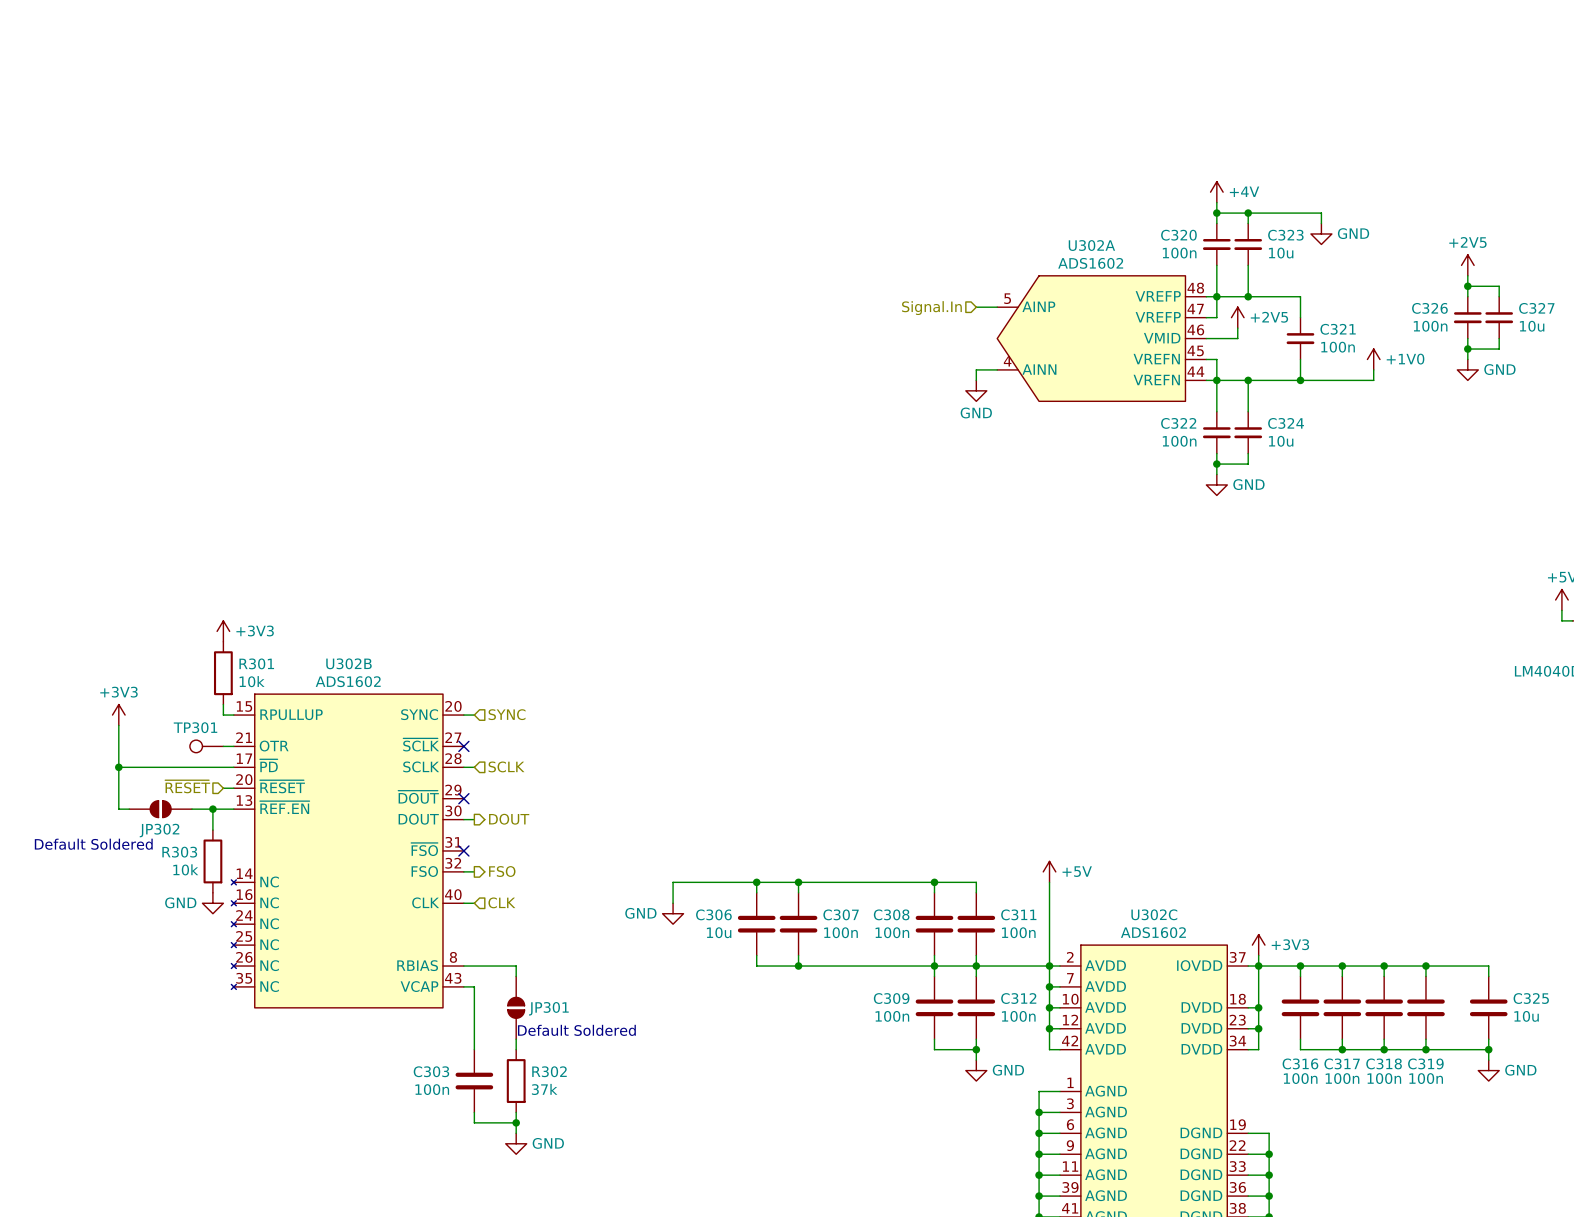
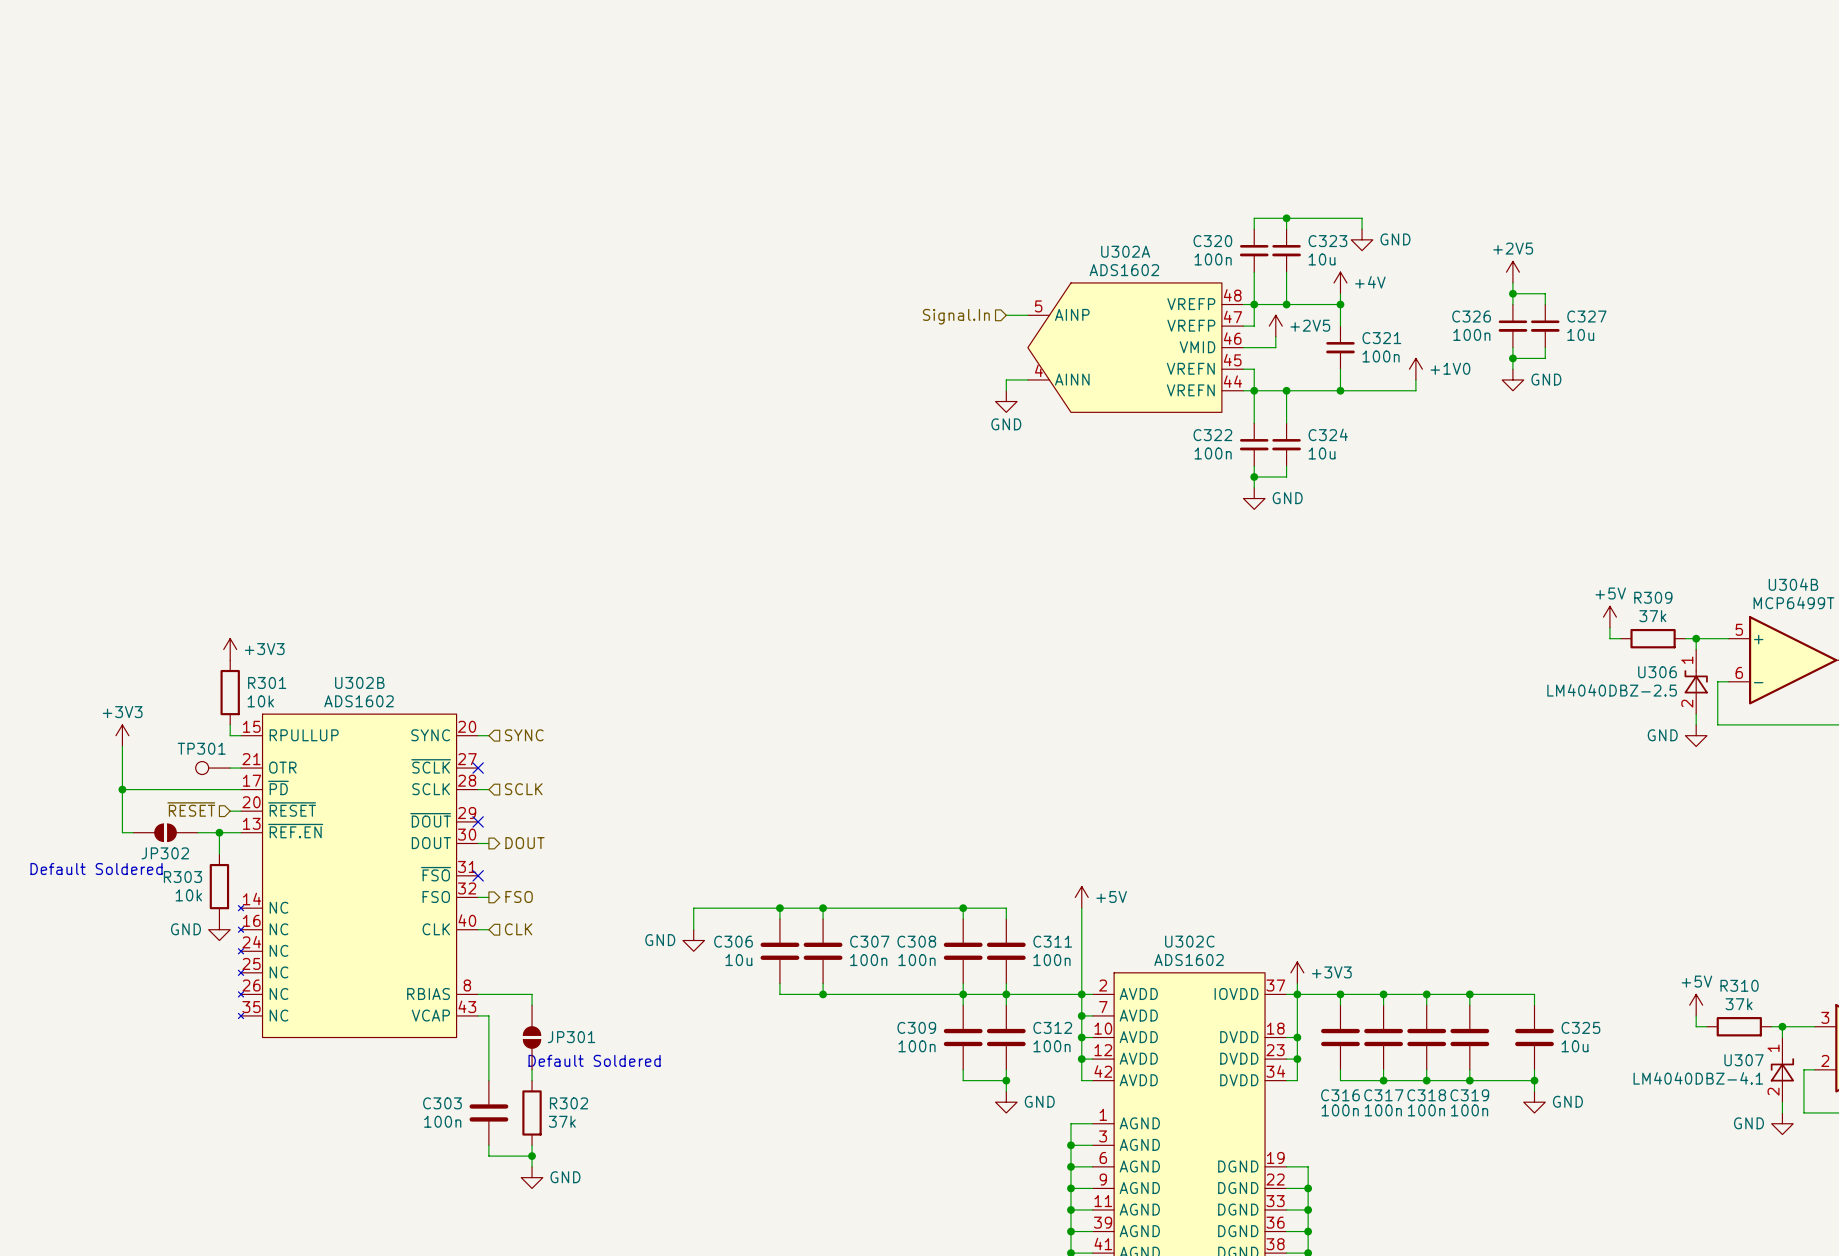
power symbol position: +4V (1216, 192) -> +4V (1340, 282)
wire: (1216, 202) (1216, 213) -> (1340, 293) (1340, 304)
junction: (1216, 213) -> none
junction: none -> (1340, 304)

